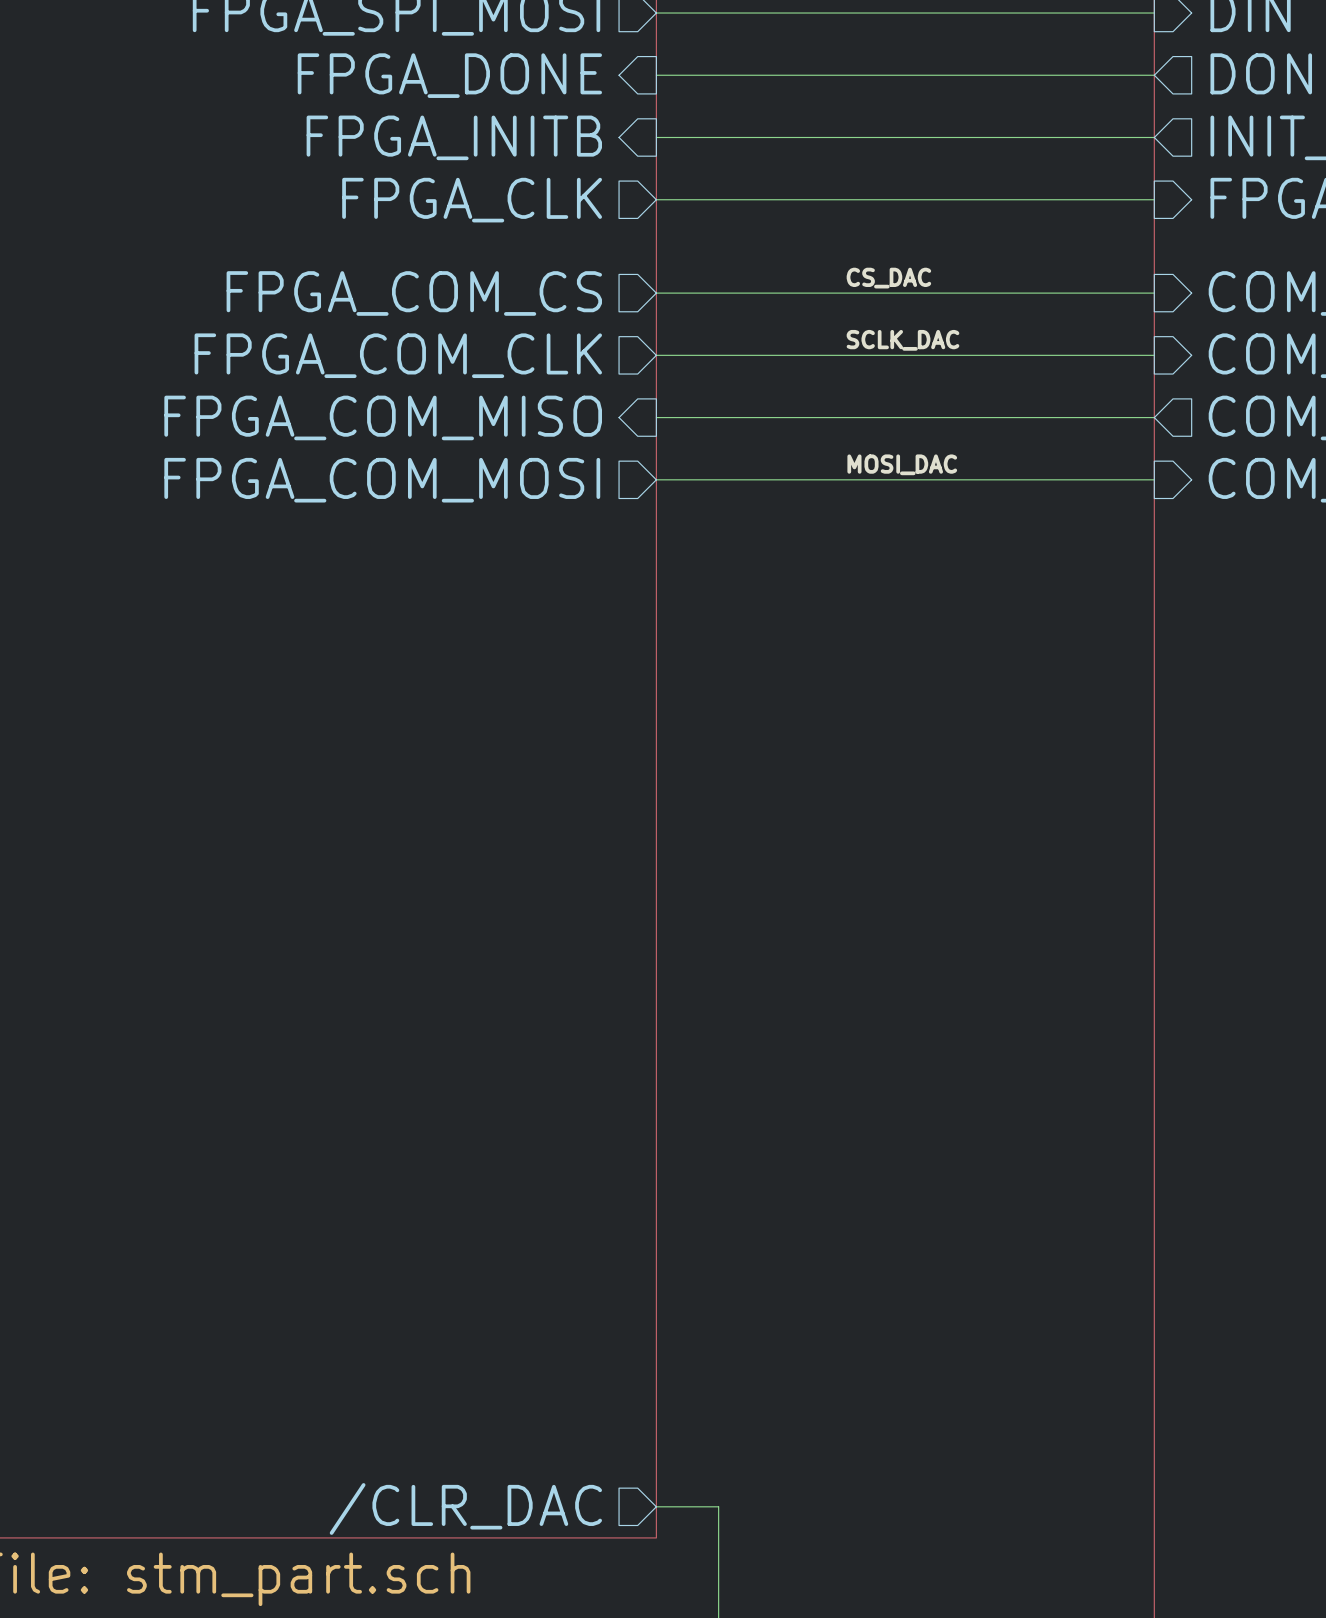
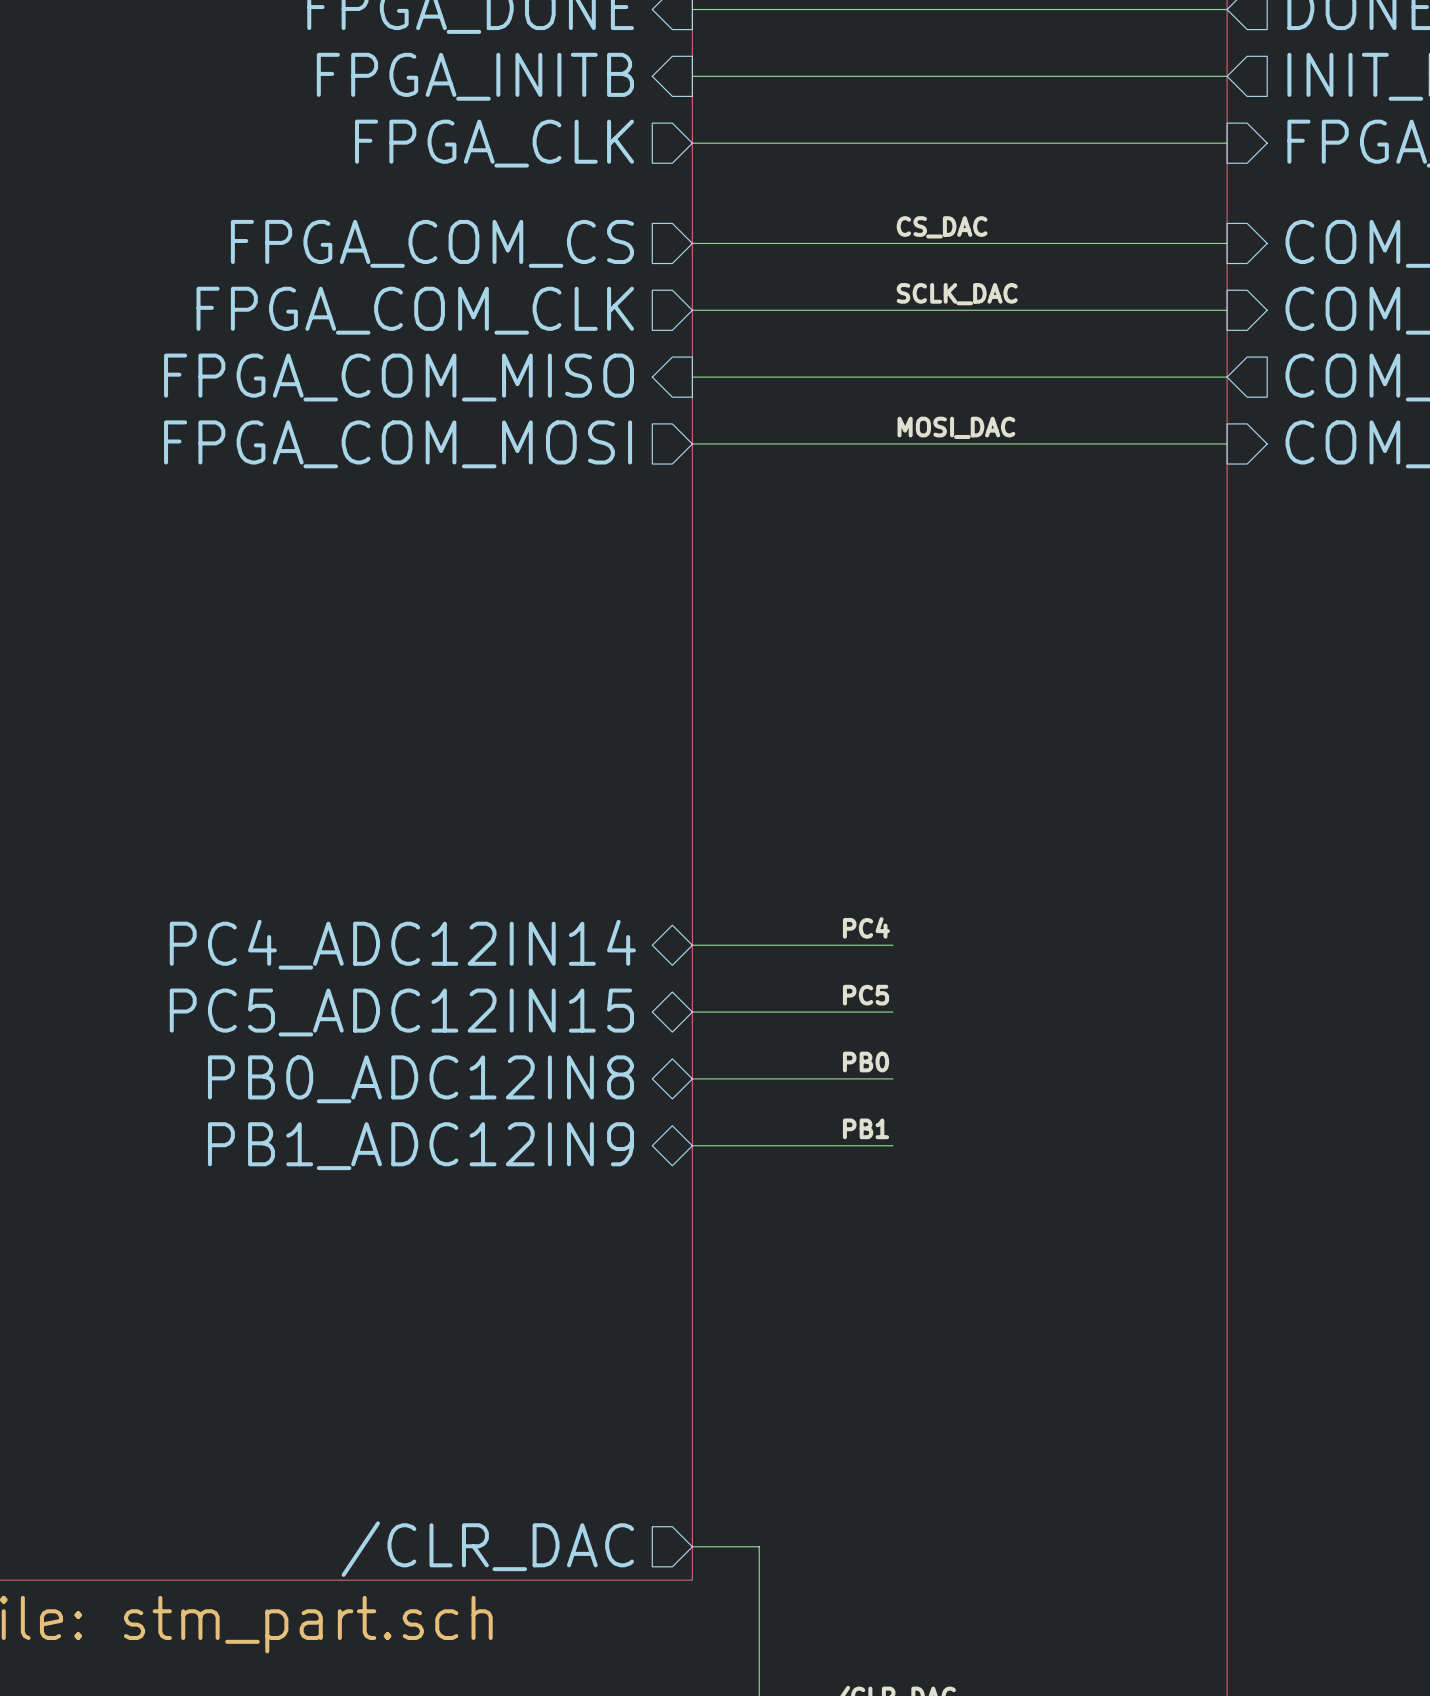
label: none -> PC4 (866, 927)
sheet pin: none -> PC4_ADC12IN14 (402, 944)
wire: none -> (692, 945) (892, 945)
label: none -> PC5 (866, 995)
wire: none -> (692, 1012) (892, 1012)
sheet pin: none -> PC5_ADC12IN15 (401, 1012)
label: none -> PB0 (866, 1061)
sheet pin: none -> PB0_ADC12IN8 (420, 1079)
wire: none -> (692, 1078) (892, 1078)
label: none -> PB1 (866, 1128)
sheet pin: none -> PB1_ADC12IN9 (420, 1146)
wire: none -> (692, 1145) (892, 1145)

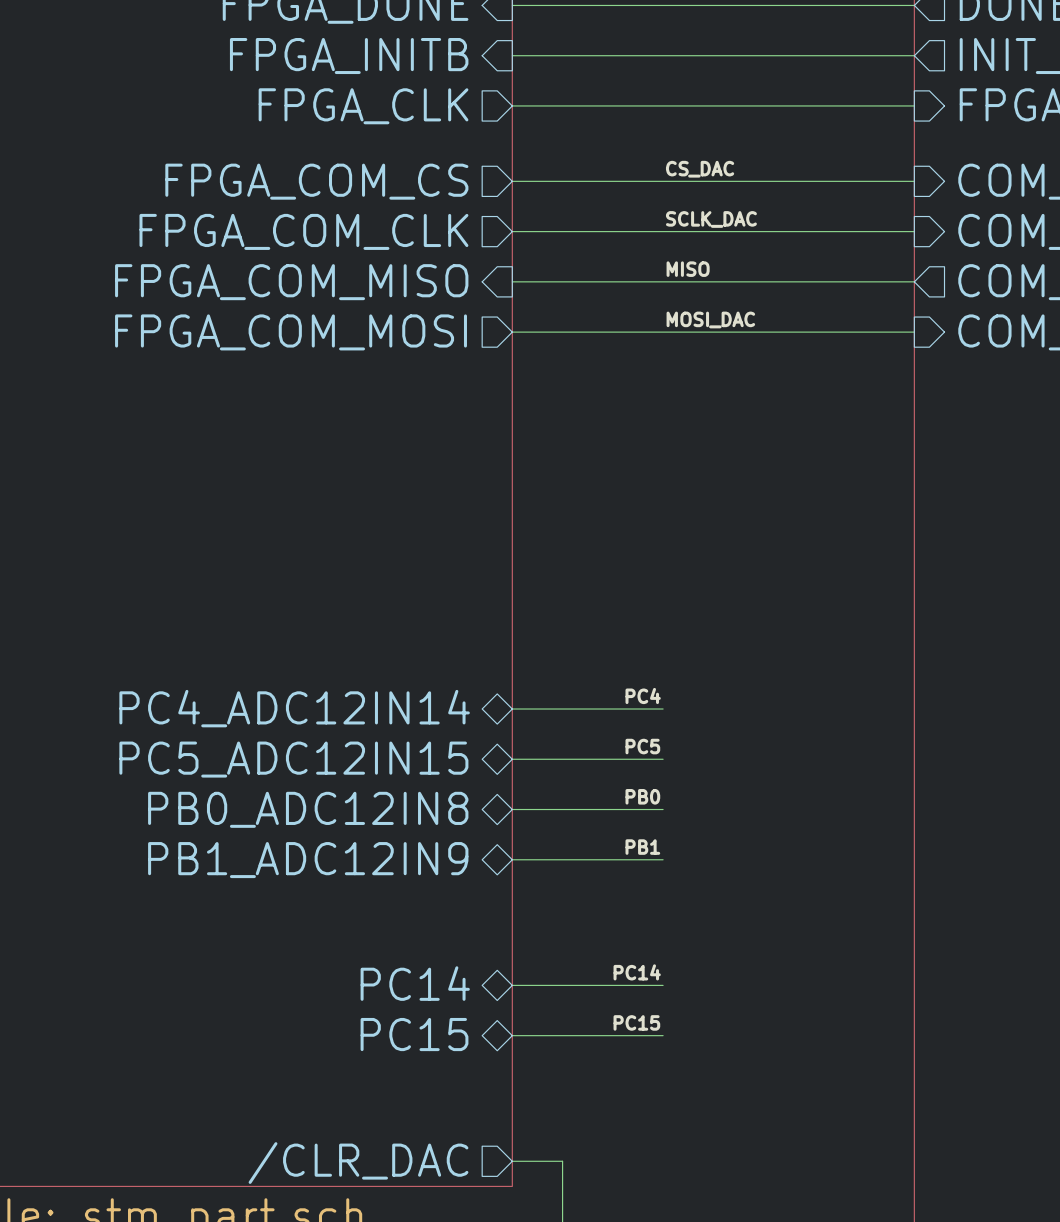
label: none -> MISO (688, 269)
label: none -> PC14 (637, 972)
sheet pin: none -> PC14 (415, 983)
wire: none -> (512, 985) (663, 985)
label: none -> PC15 (636, 1022)
sheet pin: none -> PC15 (414, 1034)
wire: none -> (512, 1035) (663, 1035)

